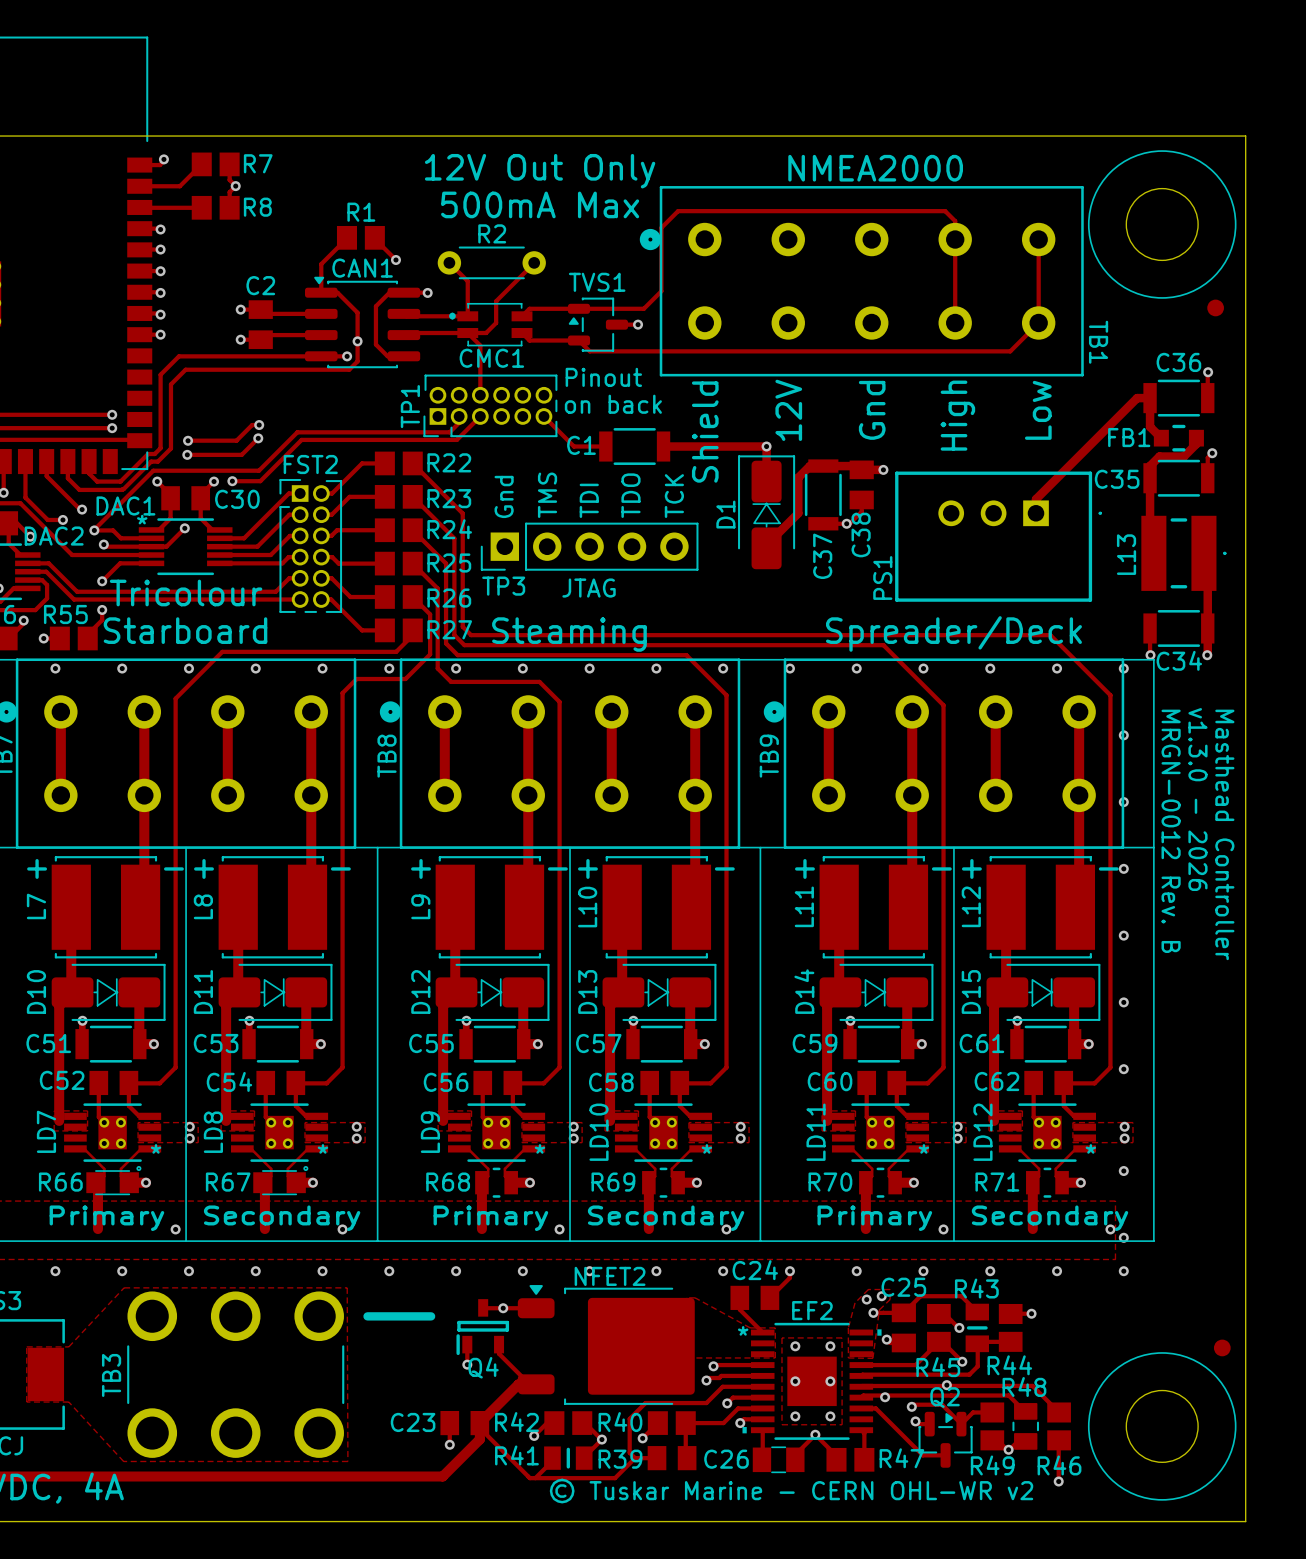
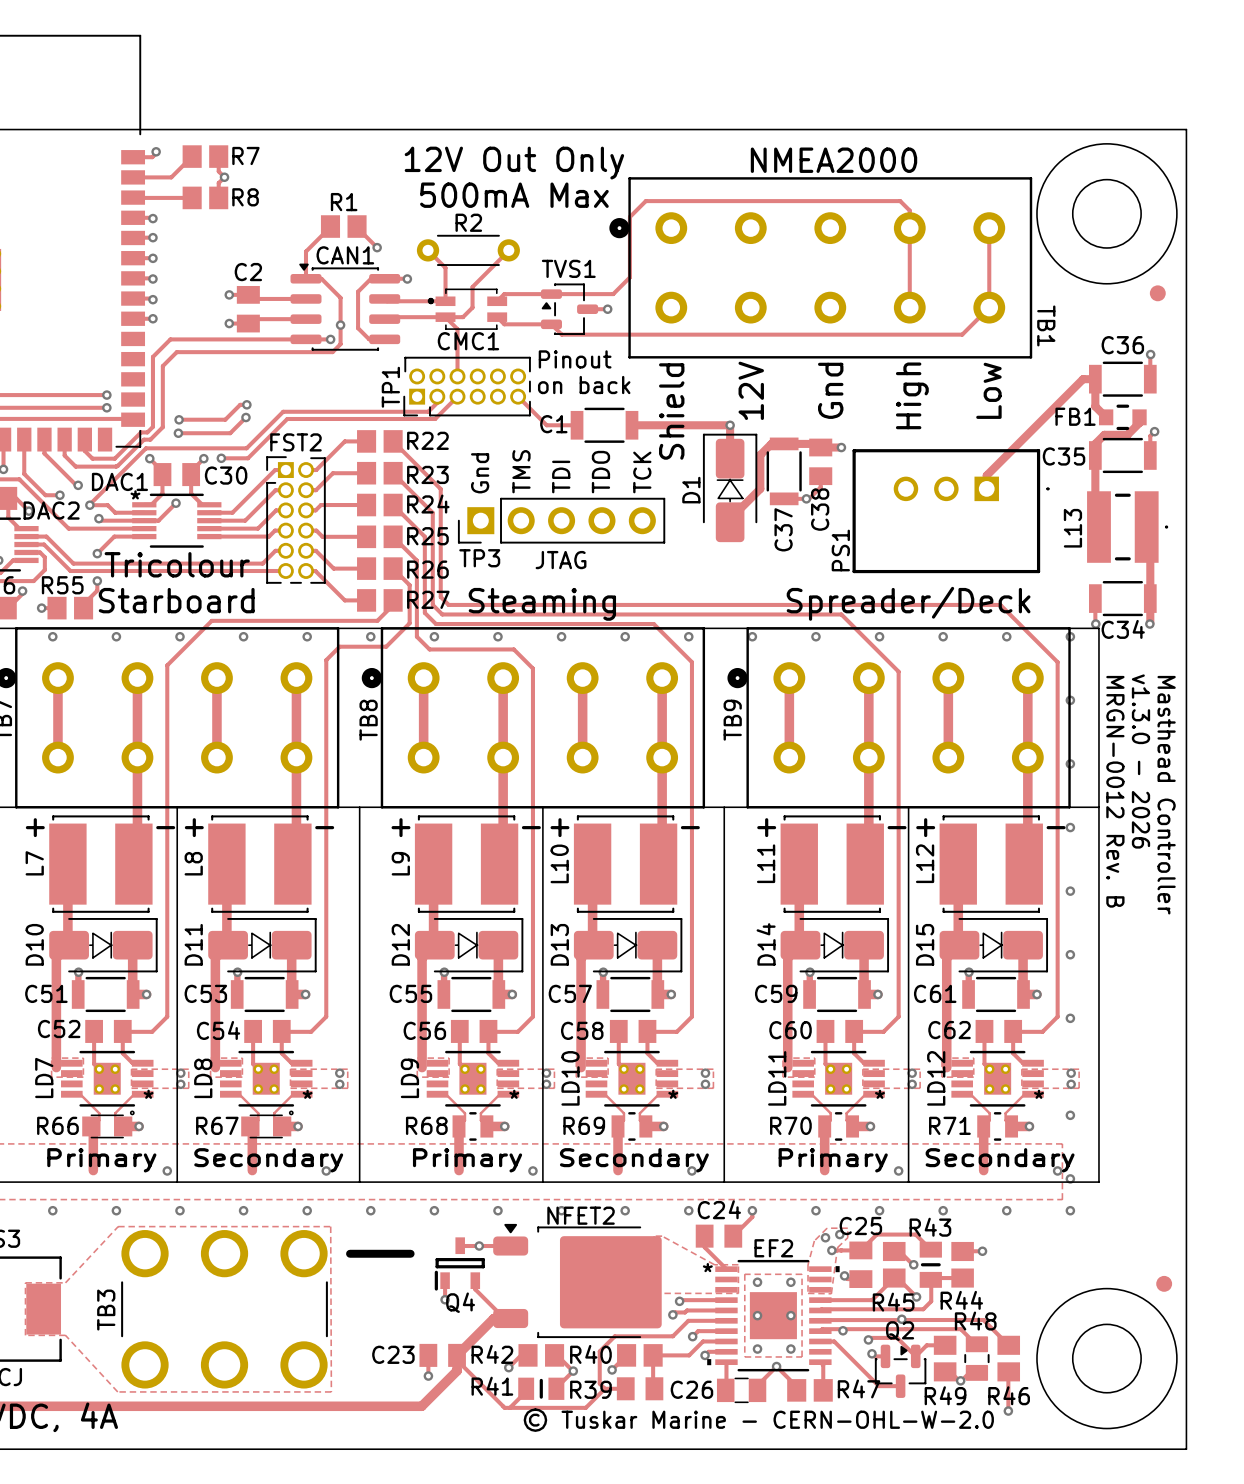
text: © Tuskar Marine - CERN OHL-WR v2 (791, 1491) -> © Tuskar Marine - CERN-OHL-W-2.0 (758, 1420)

